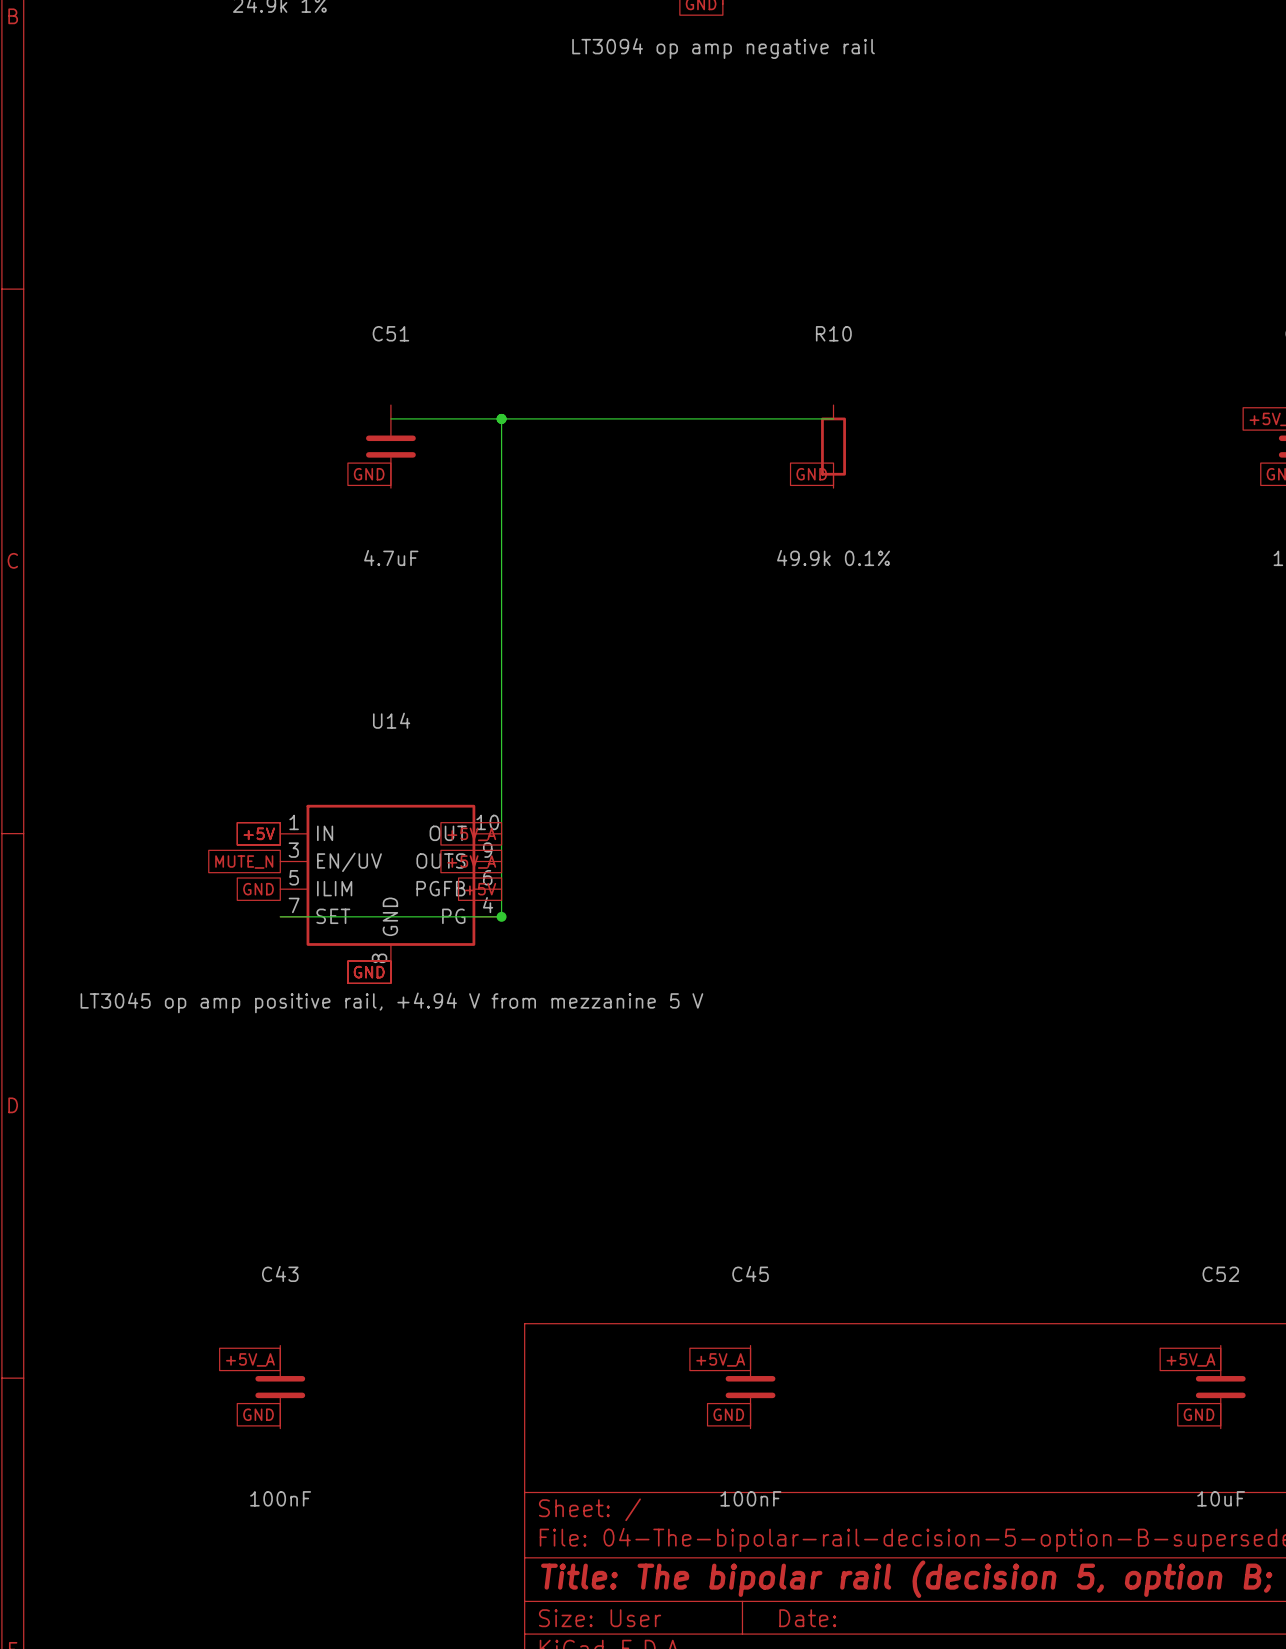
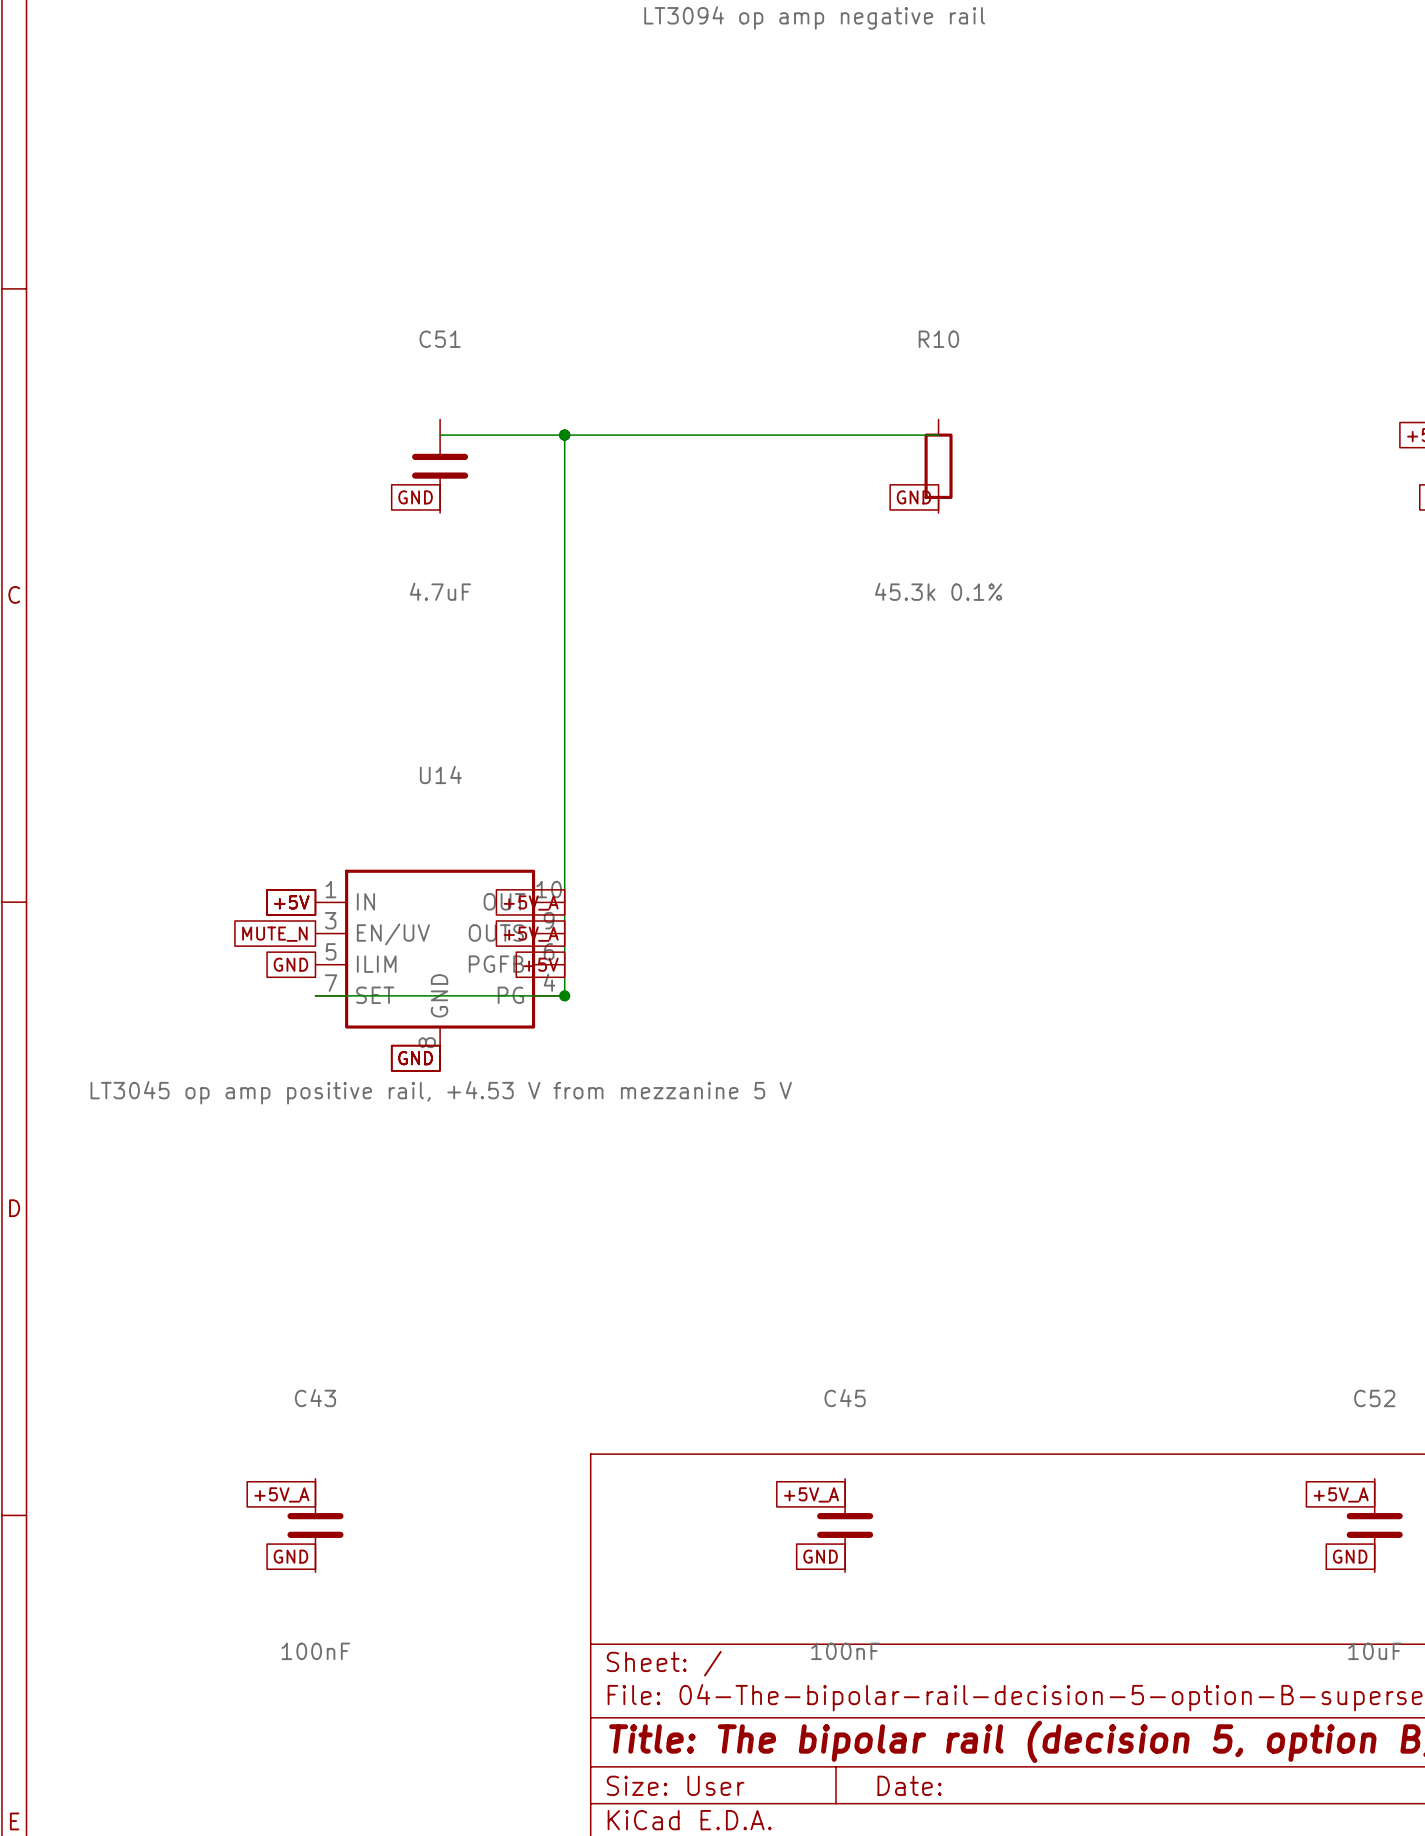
R10 value: 49.9k 0.1% (833, 558) -> 45.3k 0.1% (938, 591)
U14 value: LT3045 op amp positive rail, +4.94 V from mezzanine 5 V (391, 1002) -> LT3045 op amp positive rail, +4.53 V from mezzanine 5 V (441, 1092)

